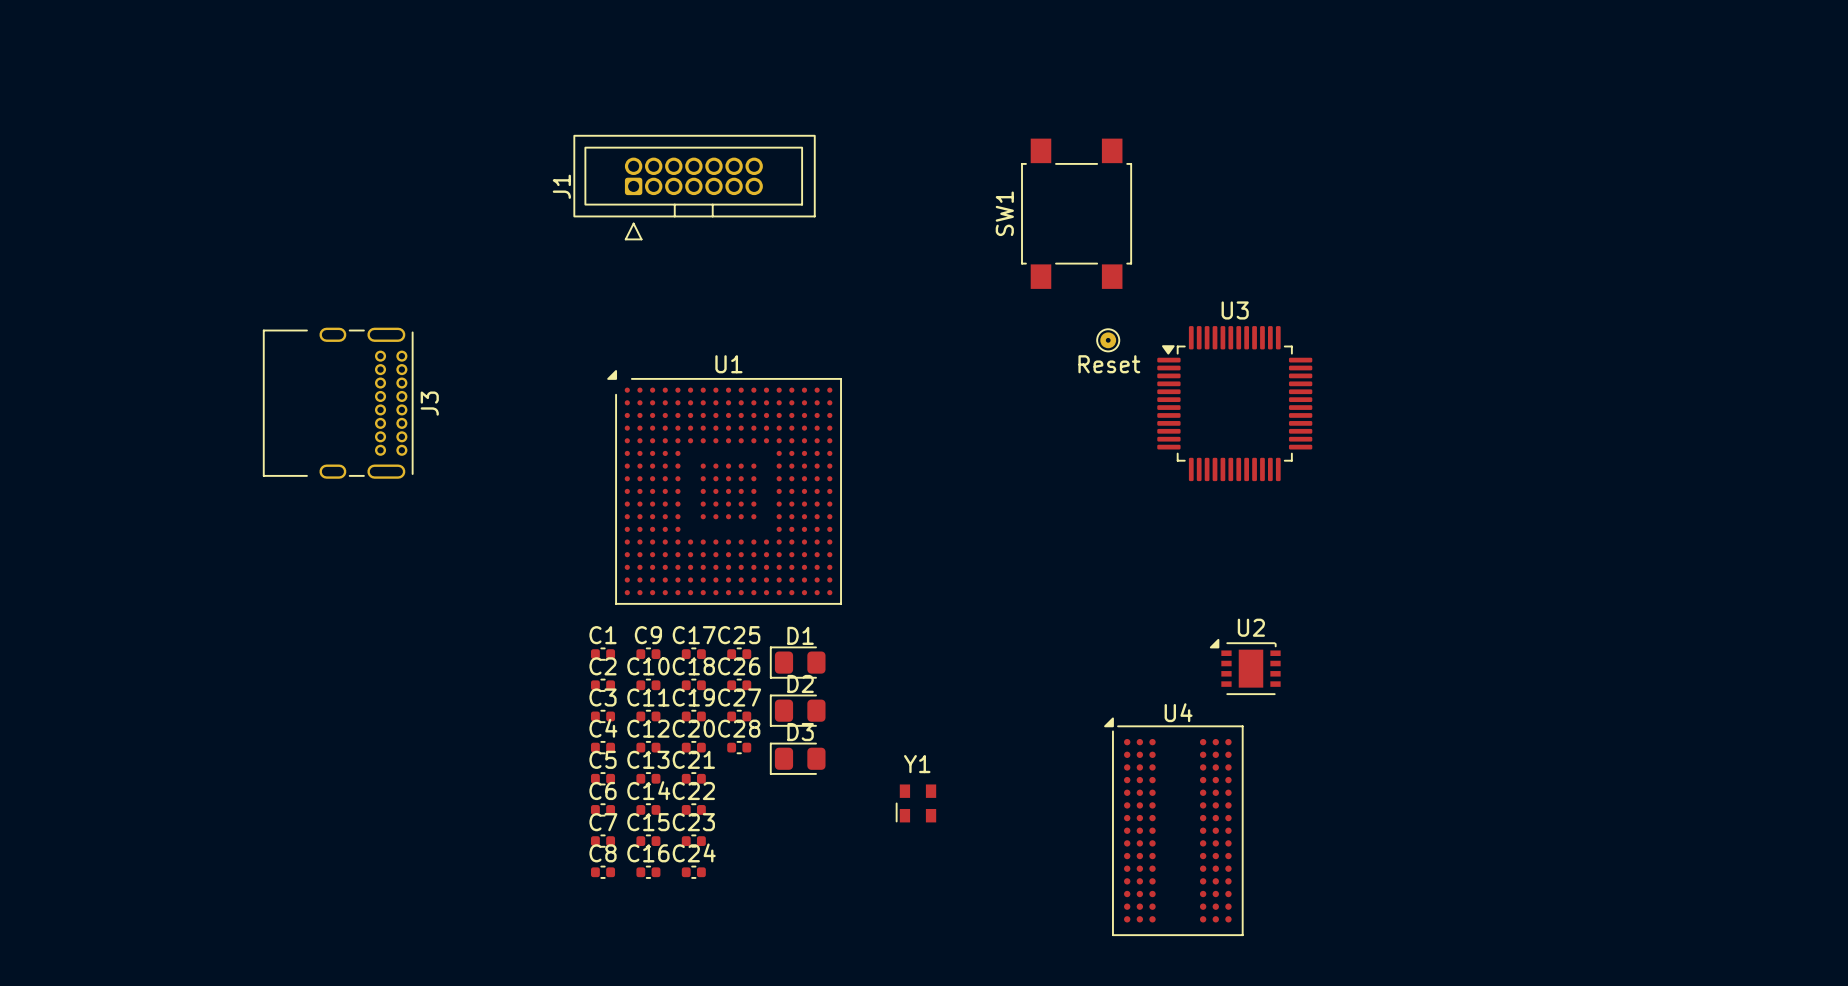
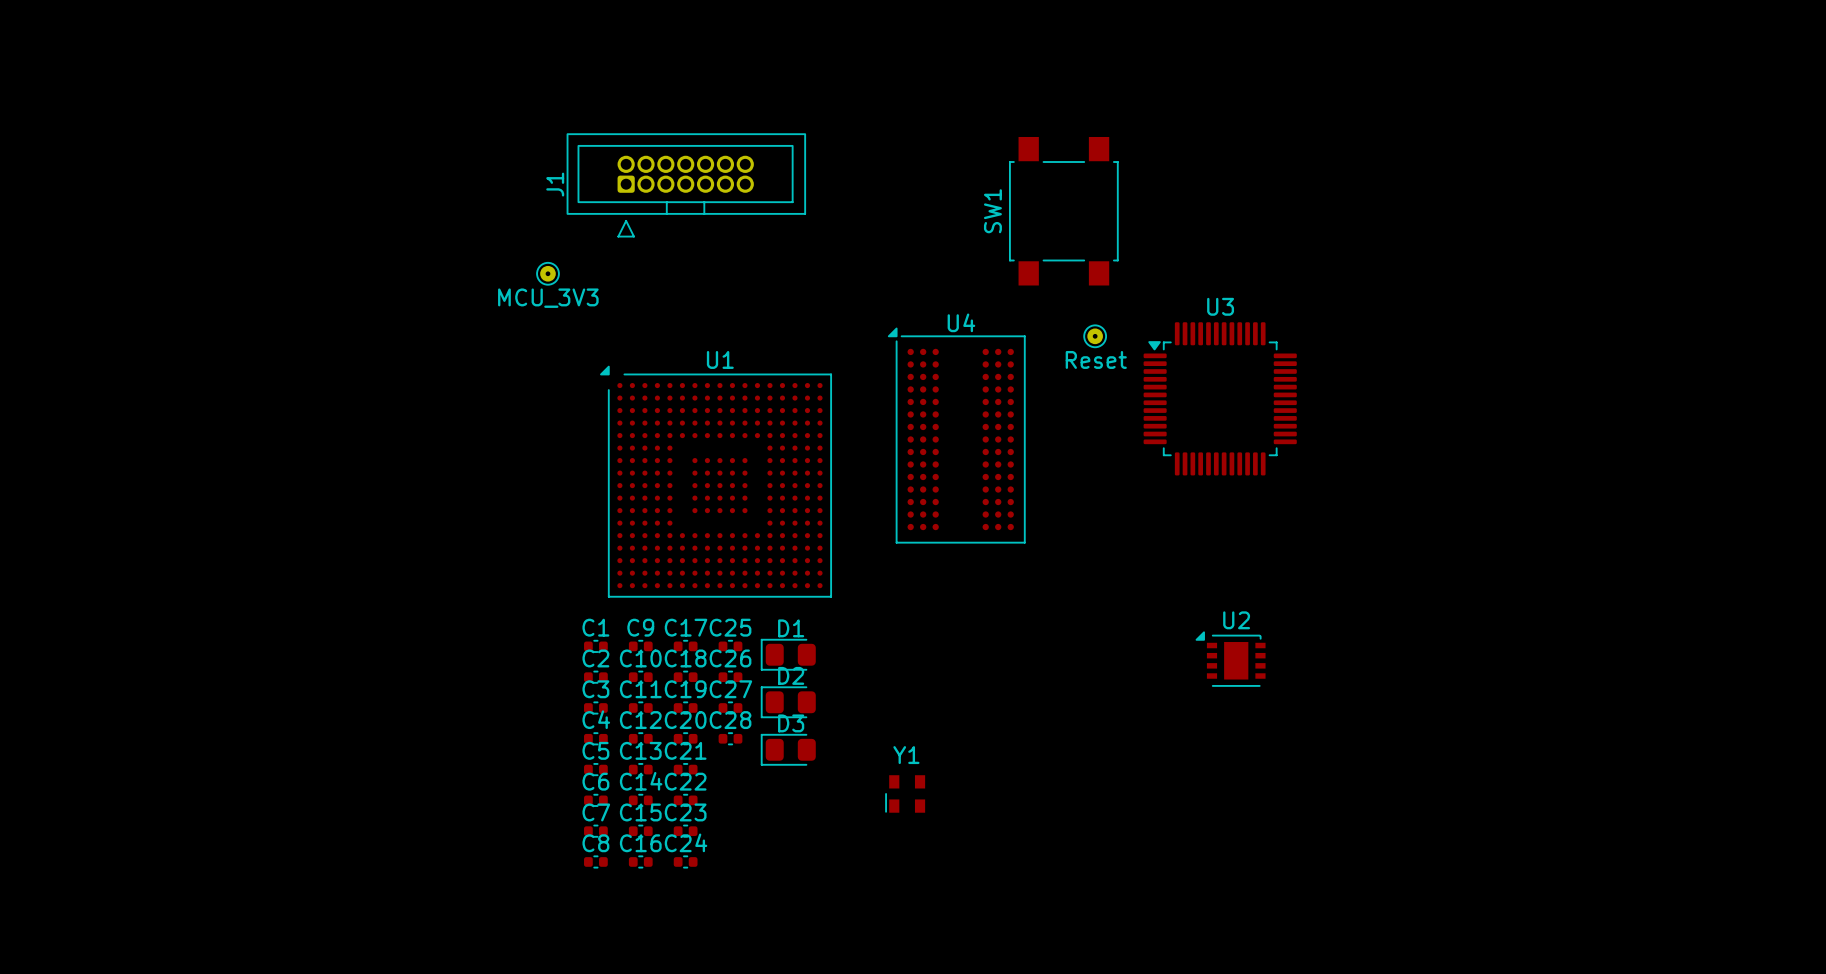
part: none -> MCU_3V3 (547, 273)
J3: (338, 403) -> none
U4 position: (1173, 826) -> (956, 435)

